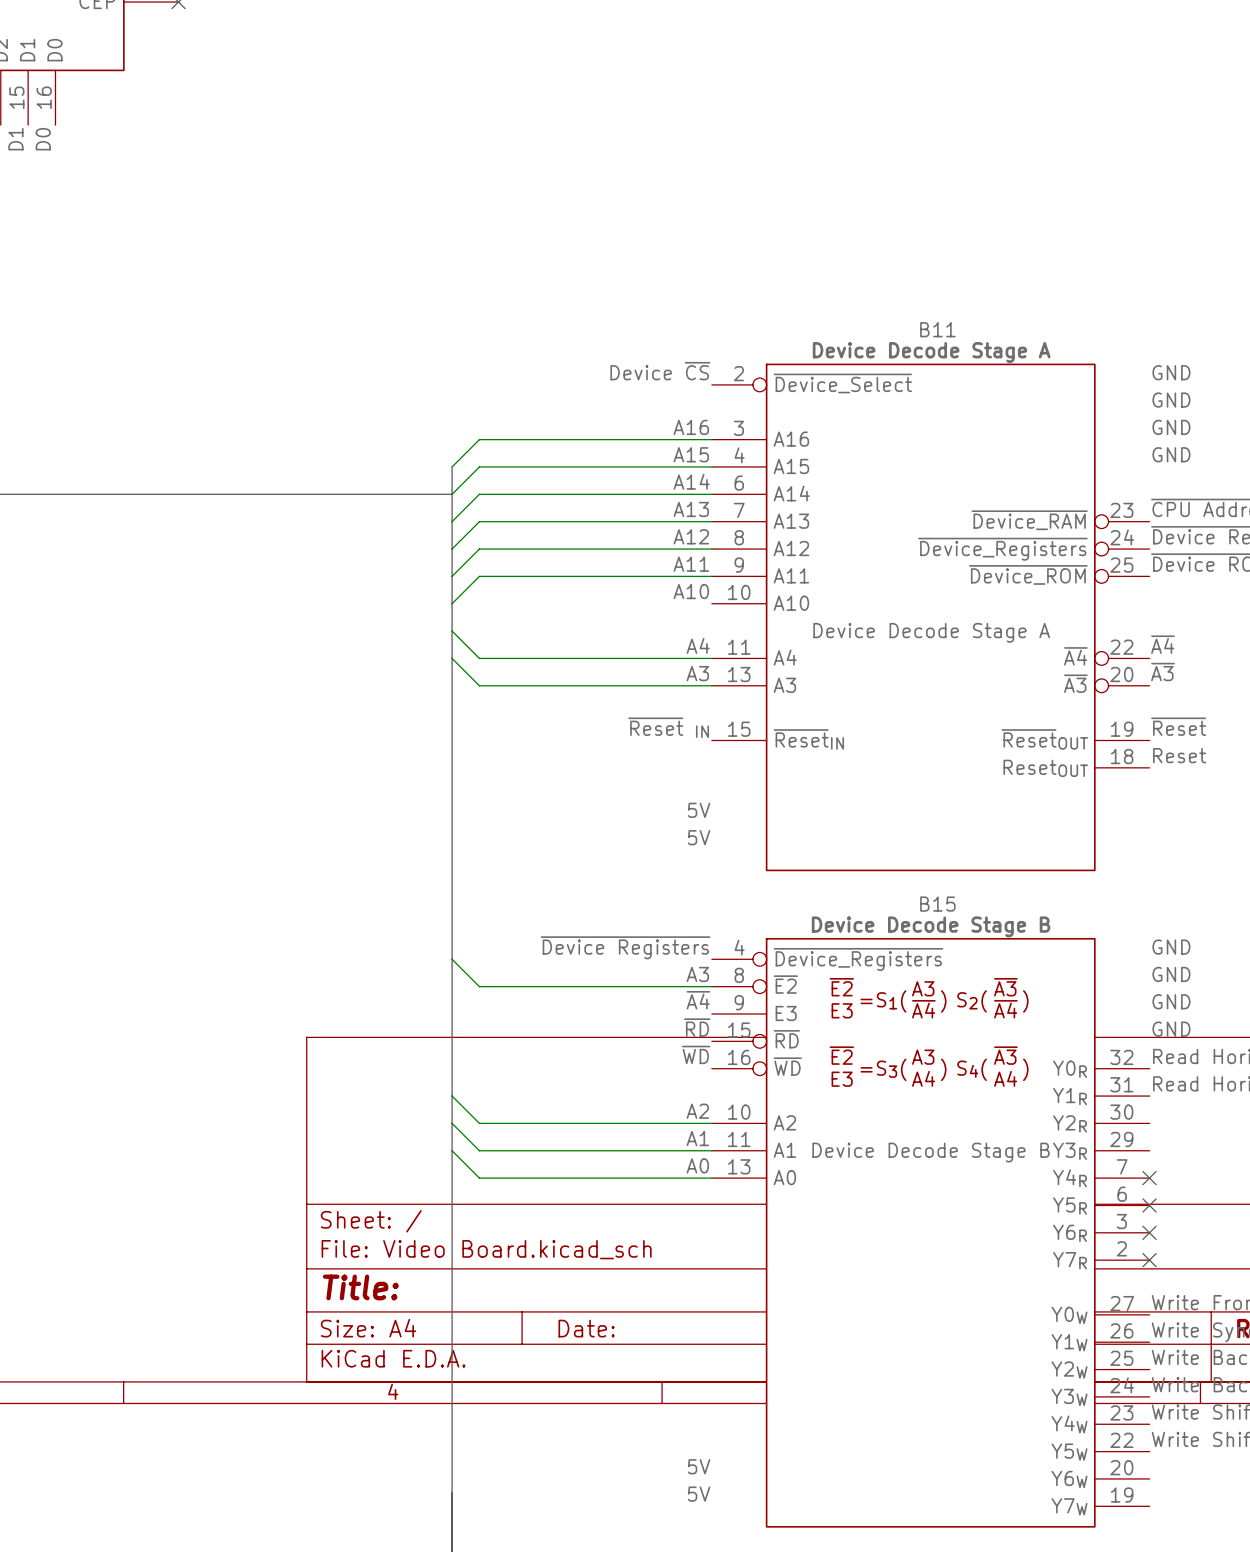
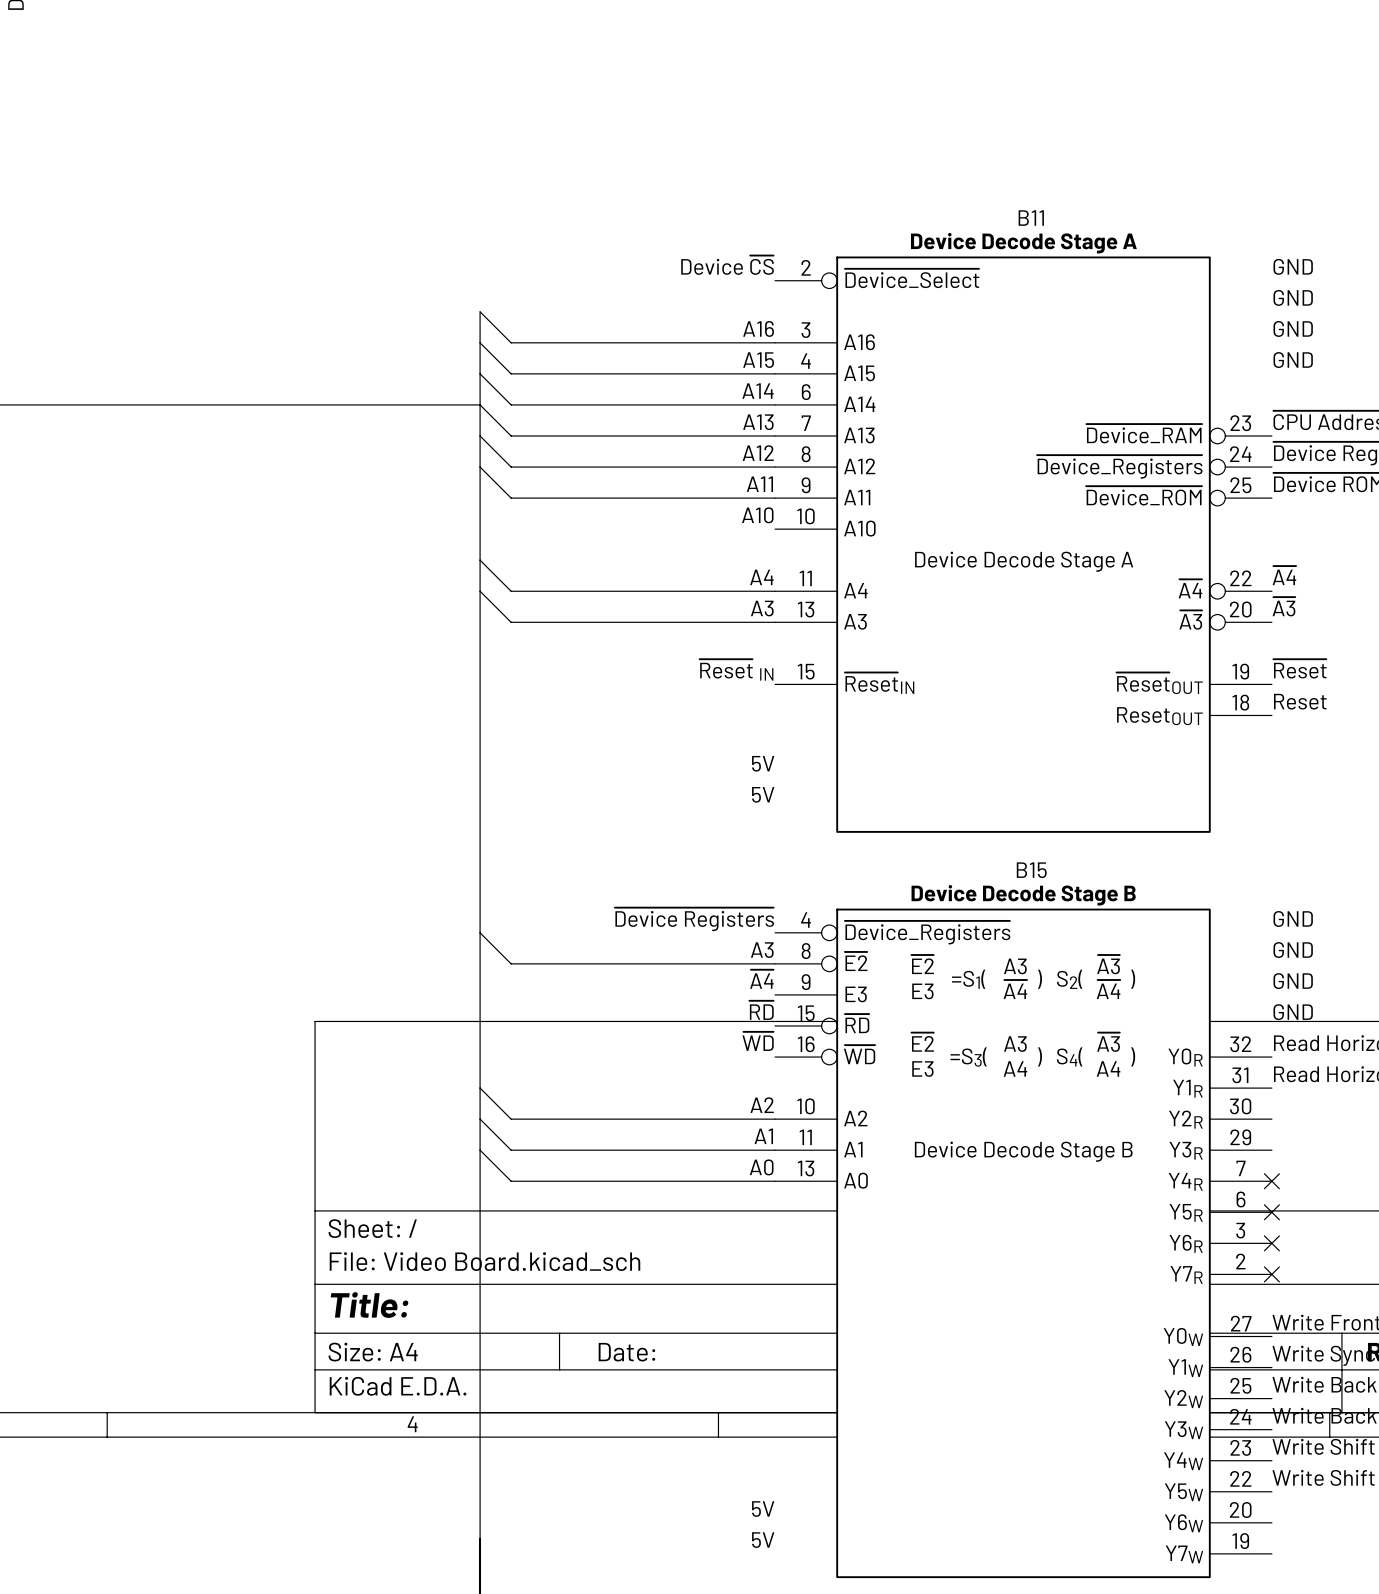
bus: none -> (480, 311) (480, 373)
wire: (479, 439) (452, 466) -> (511, 342) (480, 311)
wire: (479, 466) (452, 494) -> (511, 373) (480, 342)
wire: (479, 494) (452, 521) -> (511, 404) (480, 373)
wire: (479, 521) (452, 549) -> (511, 435) (480, 404)
wire: (479, 549) (452, 576) -> (511, 467) (480, 435)
wire: (479, 576) (452, 603) -> (511, 498) (480, 467)

